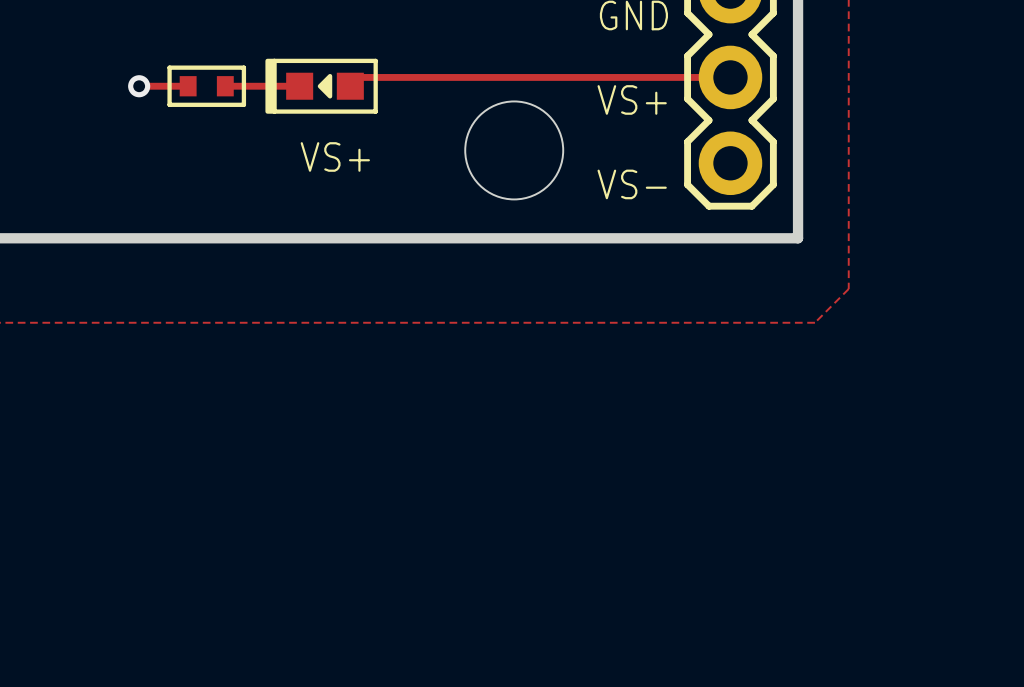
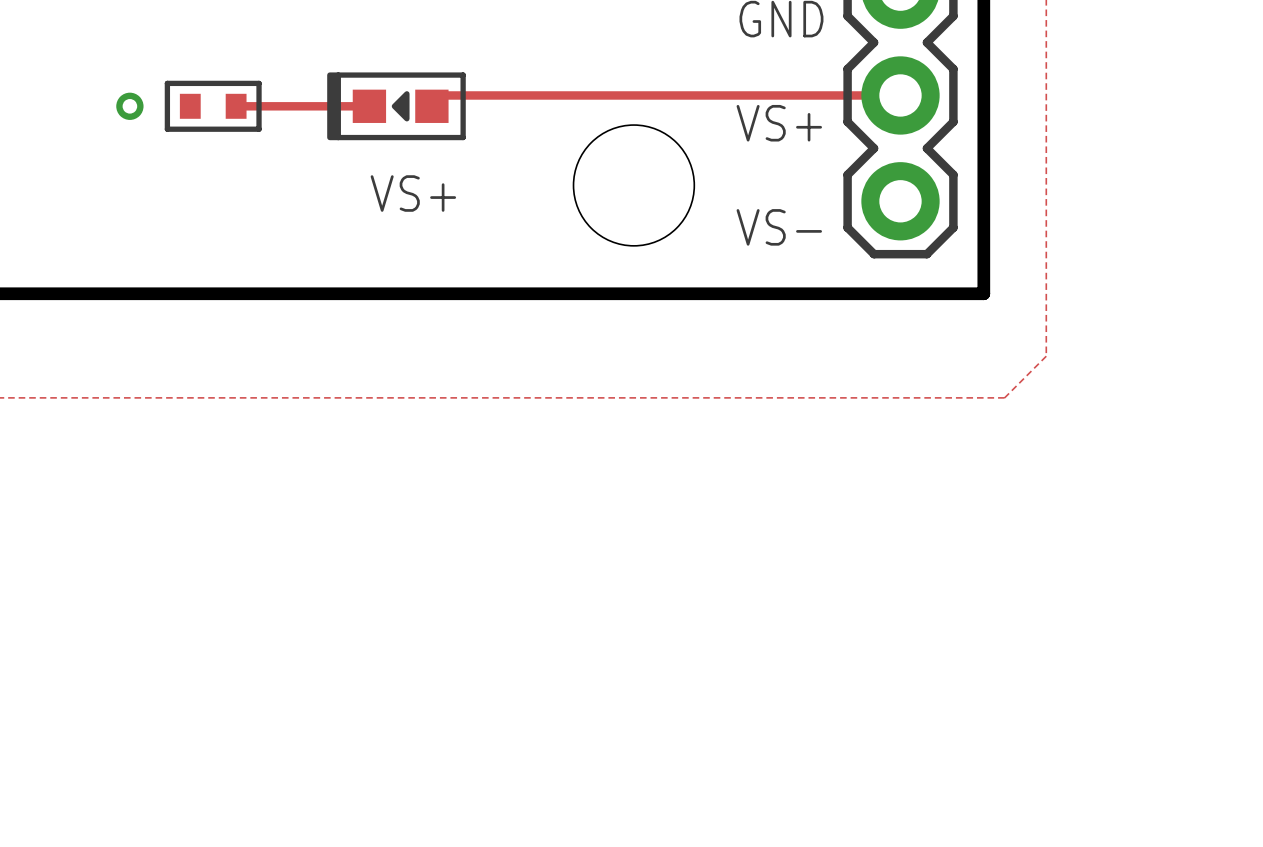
track: (139, 86) (188, 86) -> none
via position: (139, 86) -> (129, 106)
track: none -> (236, 106) (277, 106)
part position: (206, 86) -> (213, 106)

